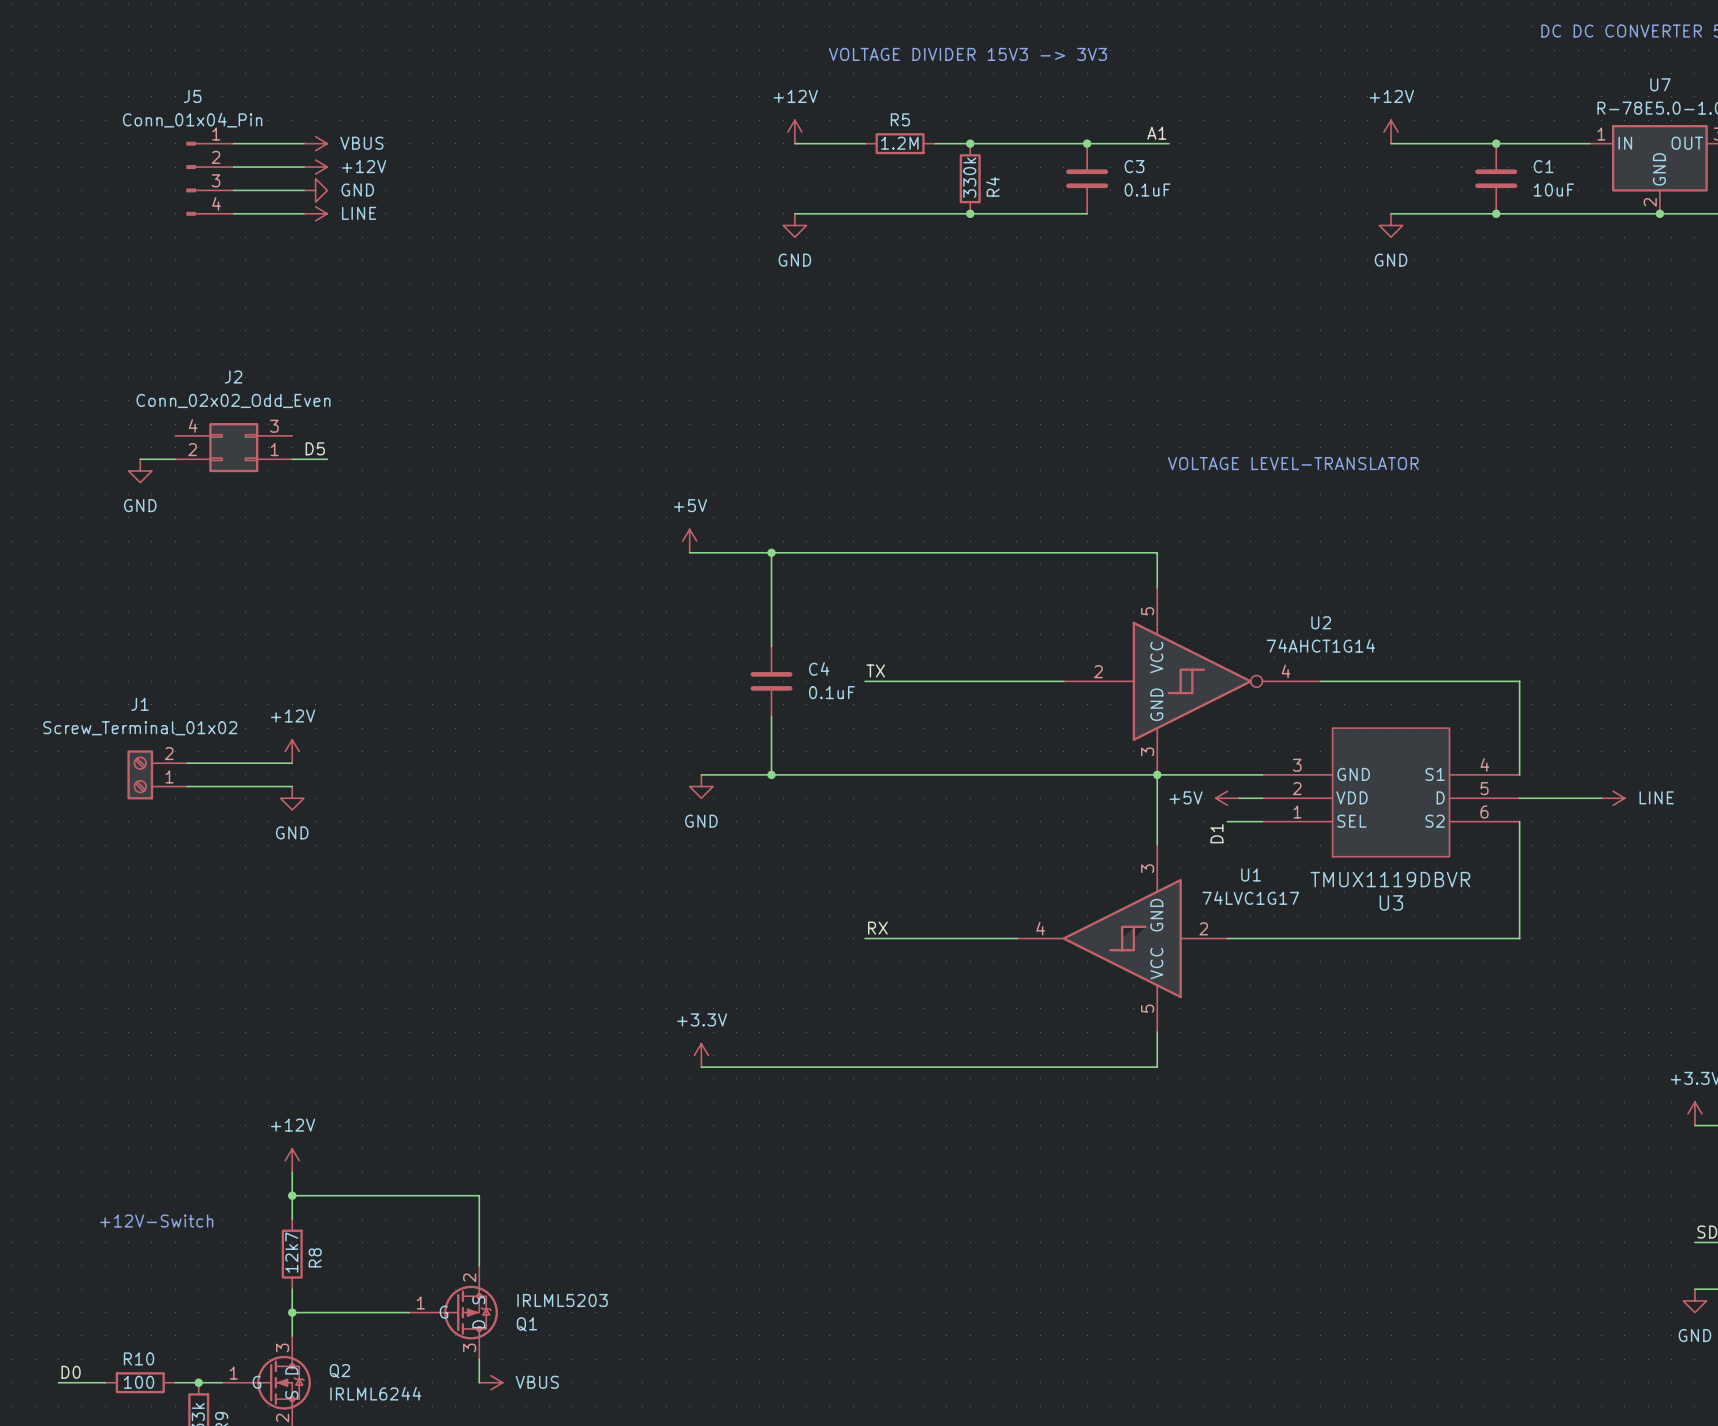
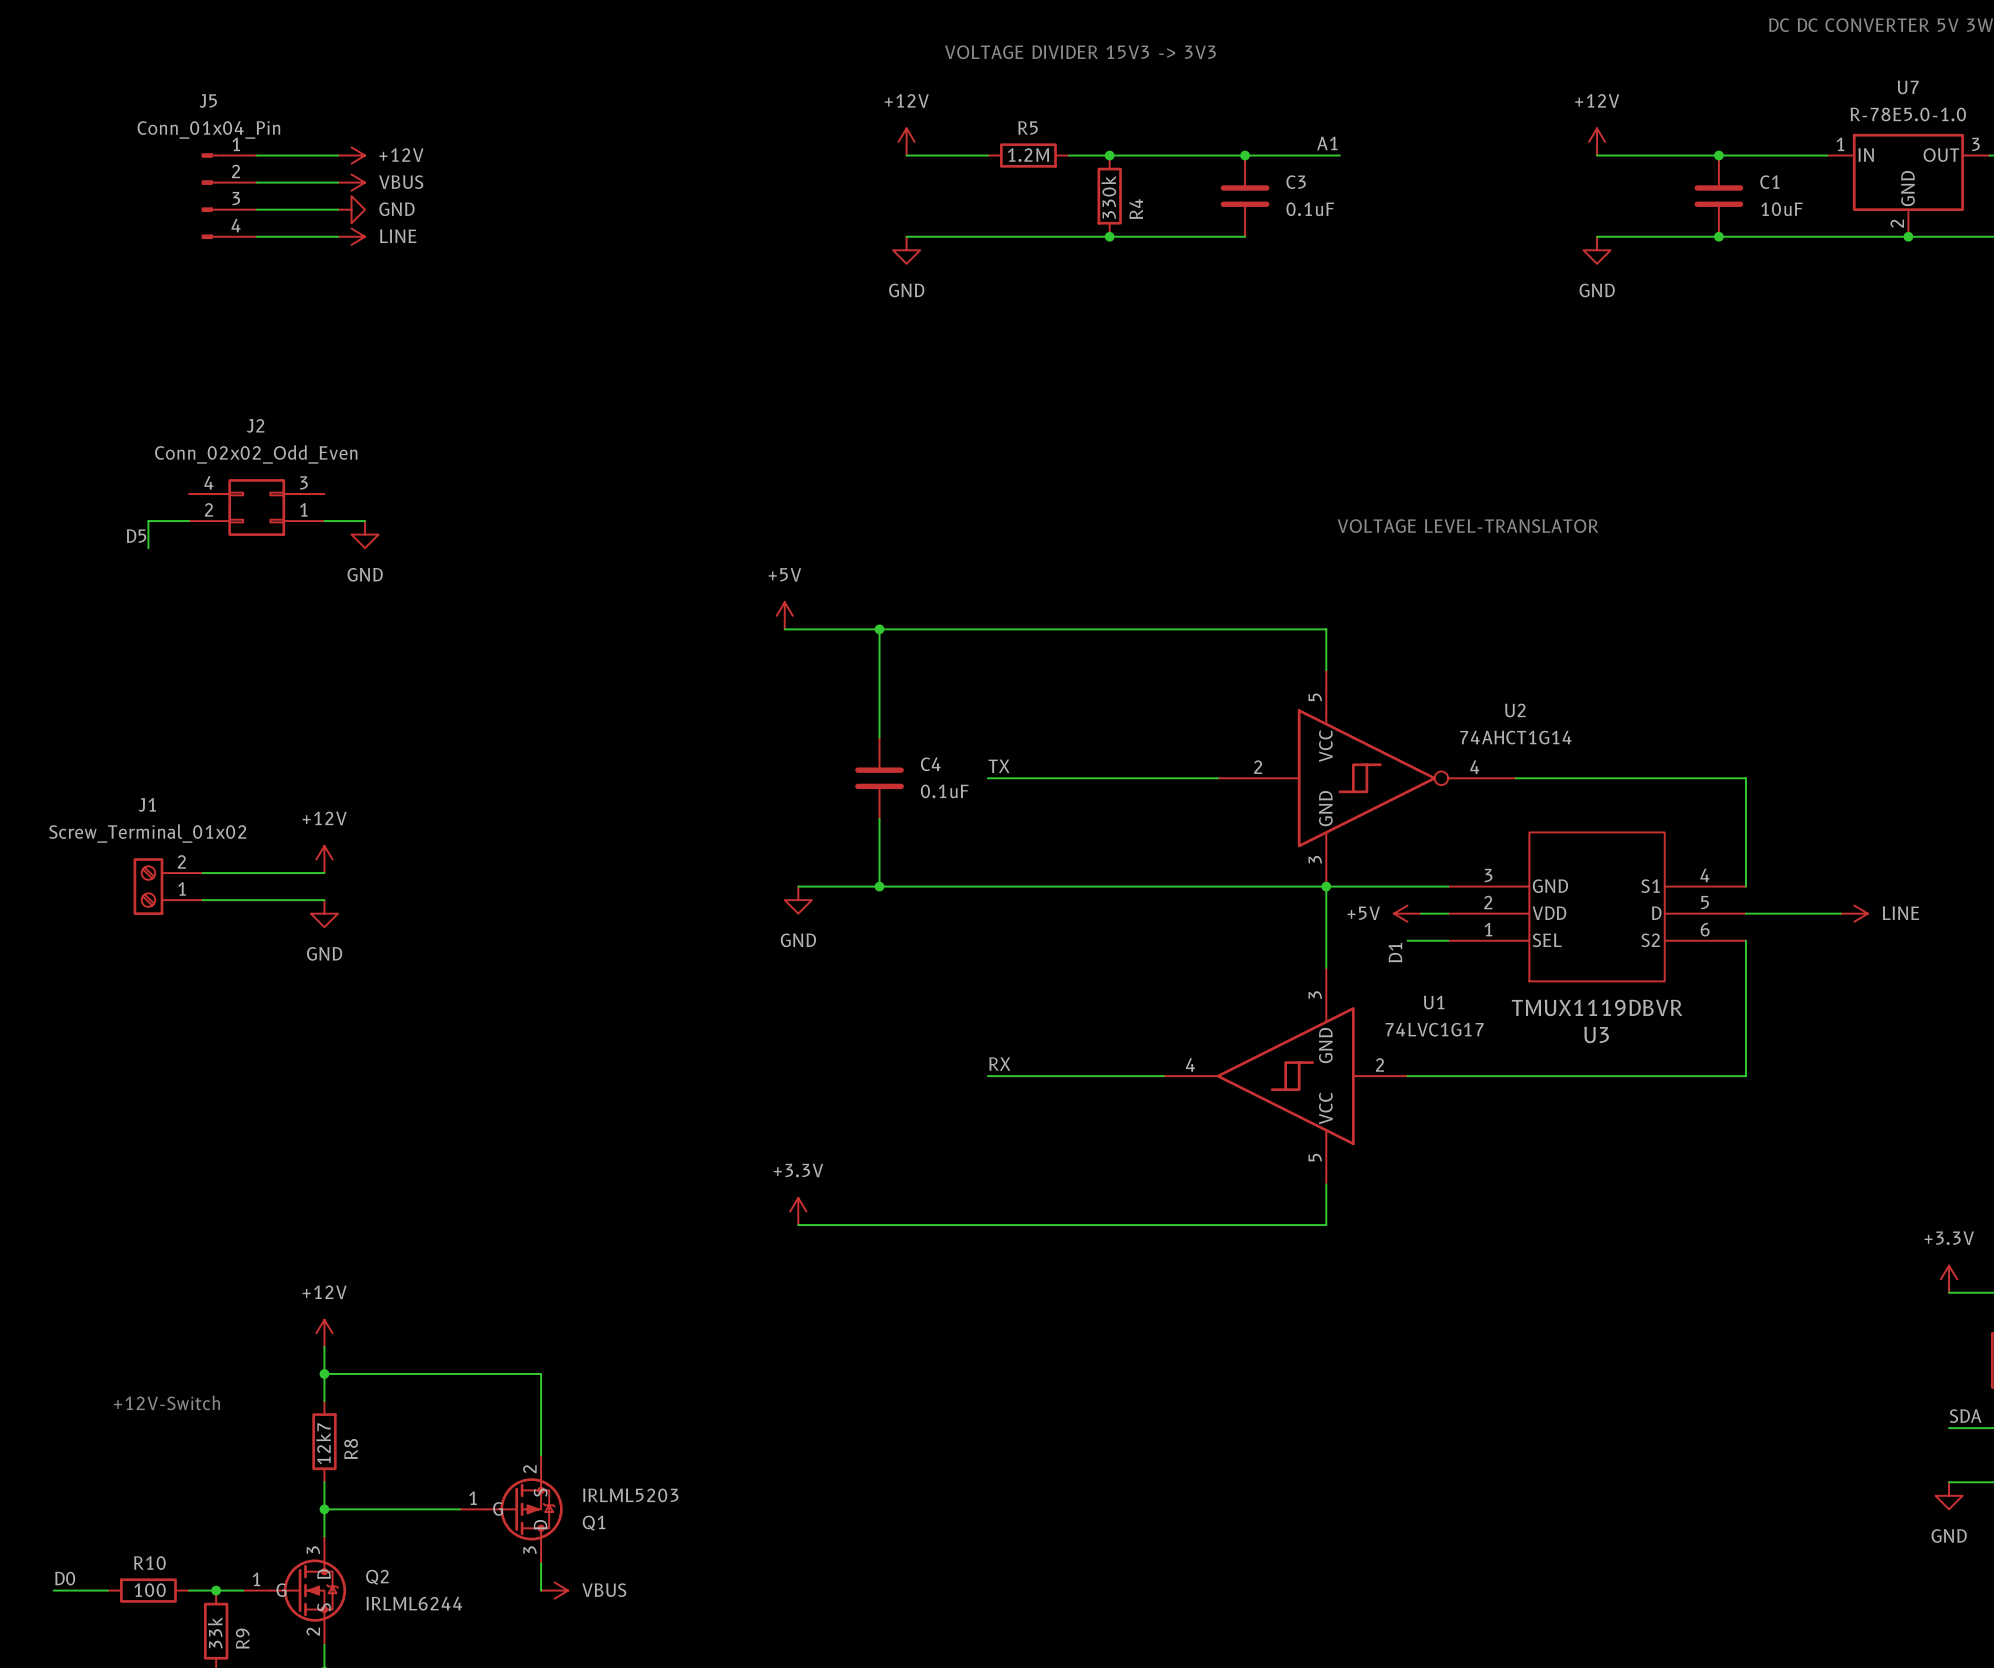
power symbol: VBUS (315, 143) -> +12V (351, 155)
power symbol: +12V (315, 167) -> VBUS (351, 182)
label position: D5 (315, 448) -> D5 (136, 536)
power symbol position: GND (140, 470) -> GND (365, 534)

